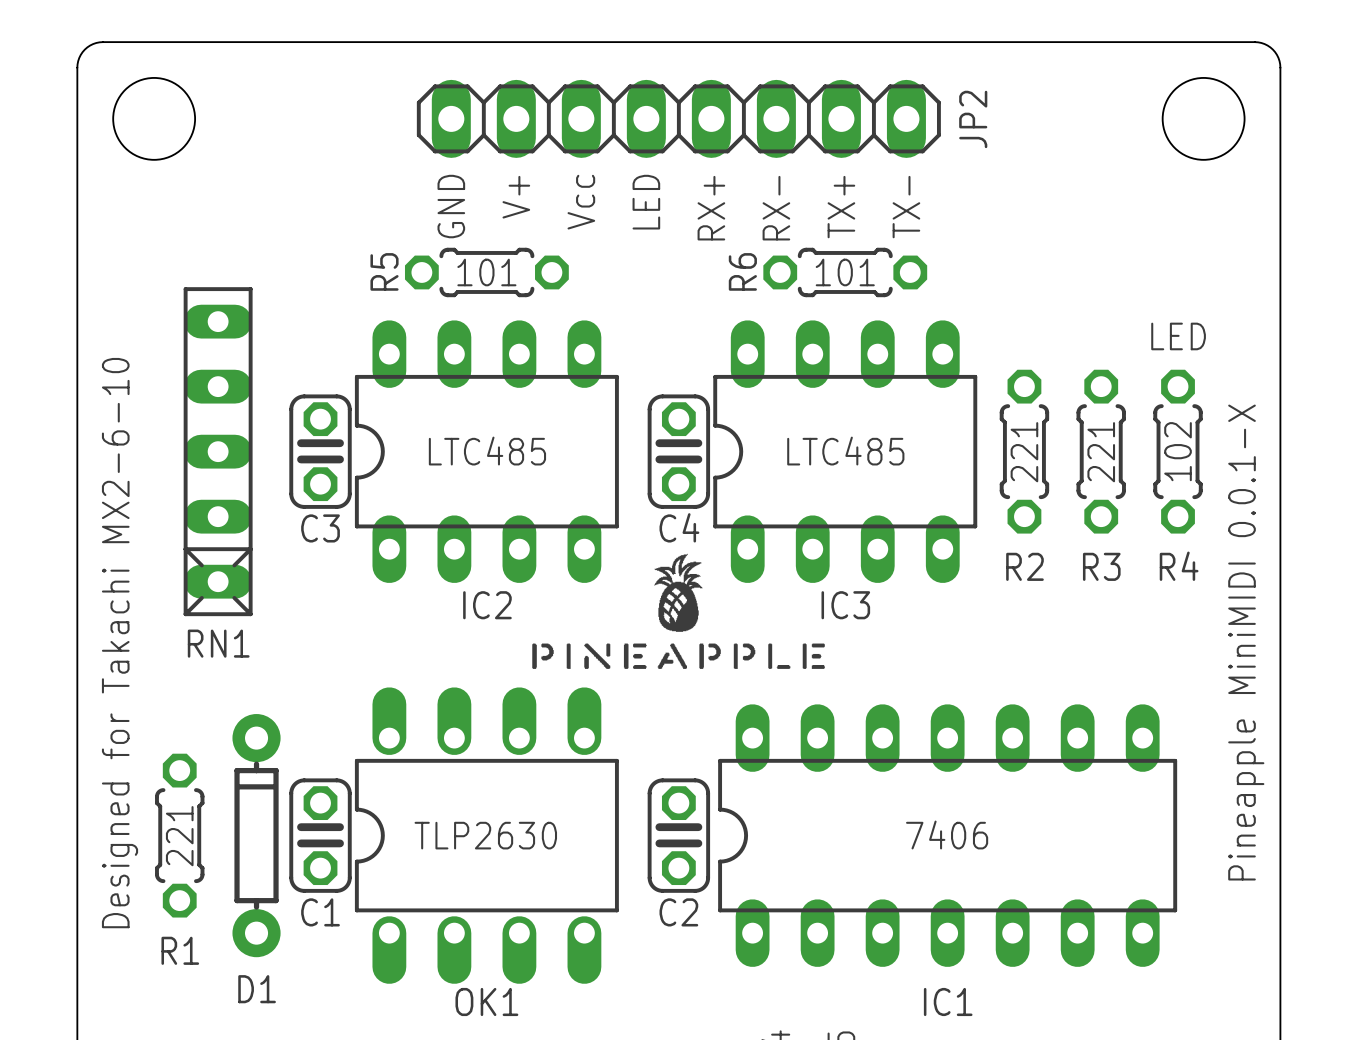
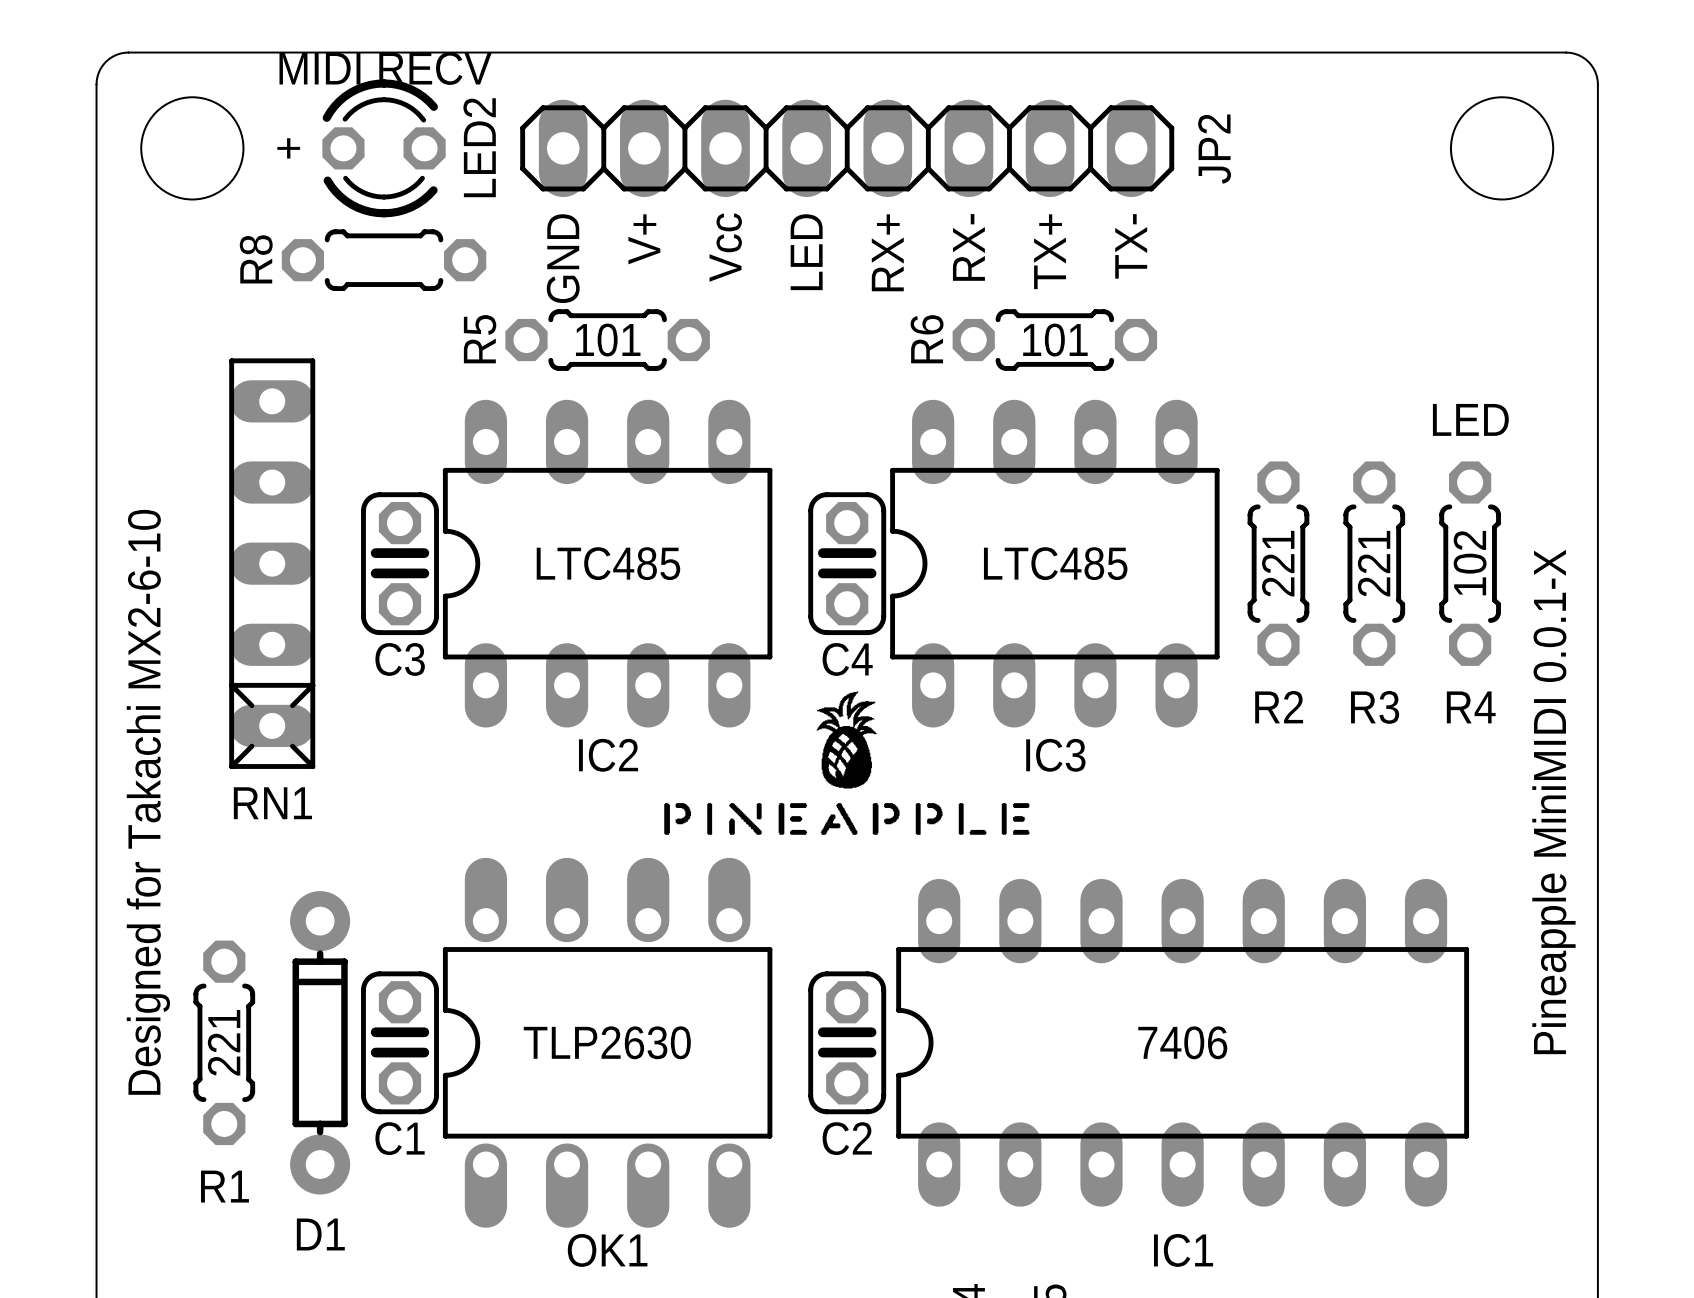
text: none -> MIDI RECV (385, 68)
text: none -> + (288, 148)
LED2: none -> (384, 148)
R8: none -> (384, 260)

